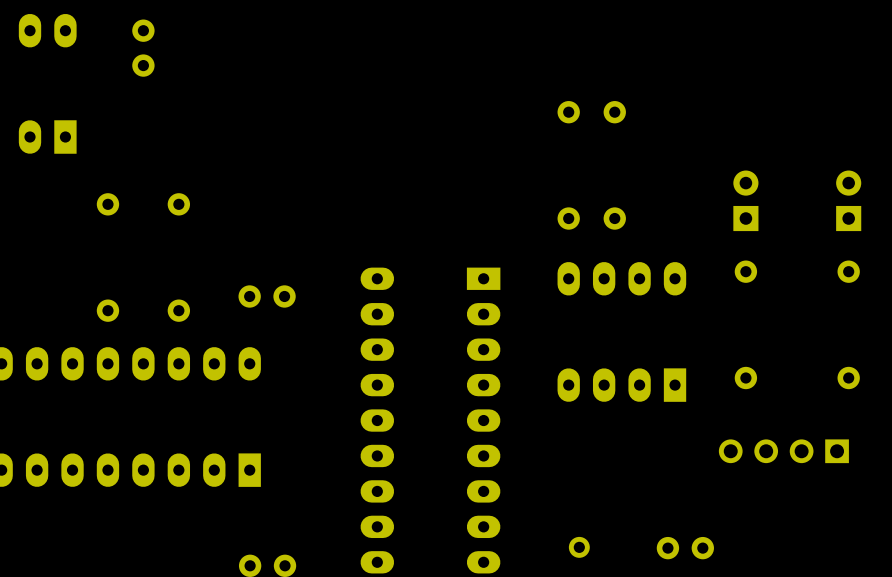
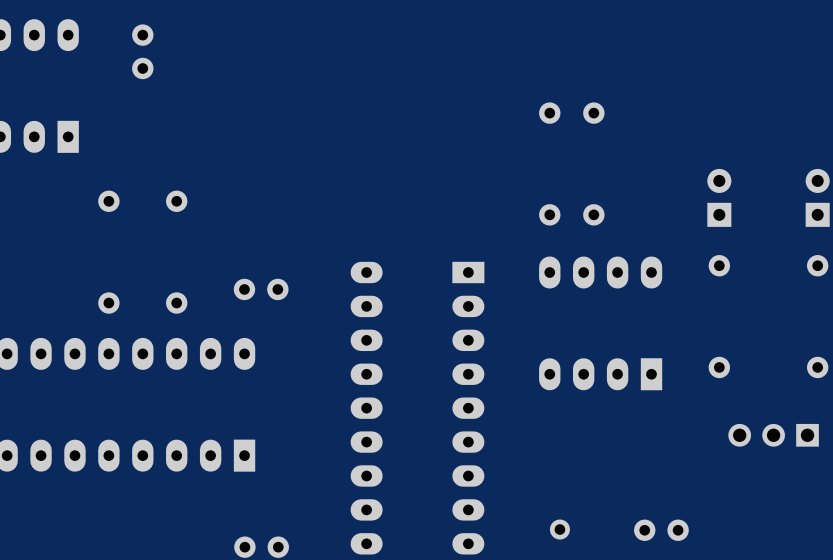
part: none -> (773, 435)
part: (783, 451) -> none

